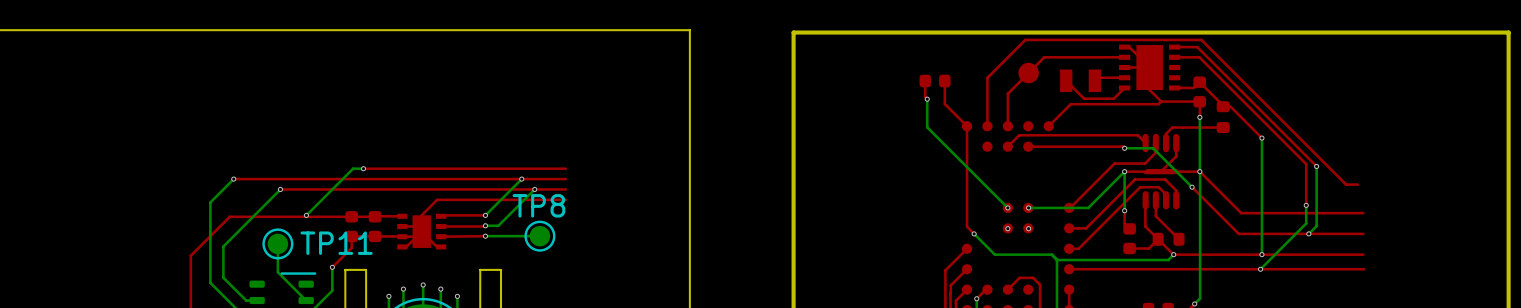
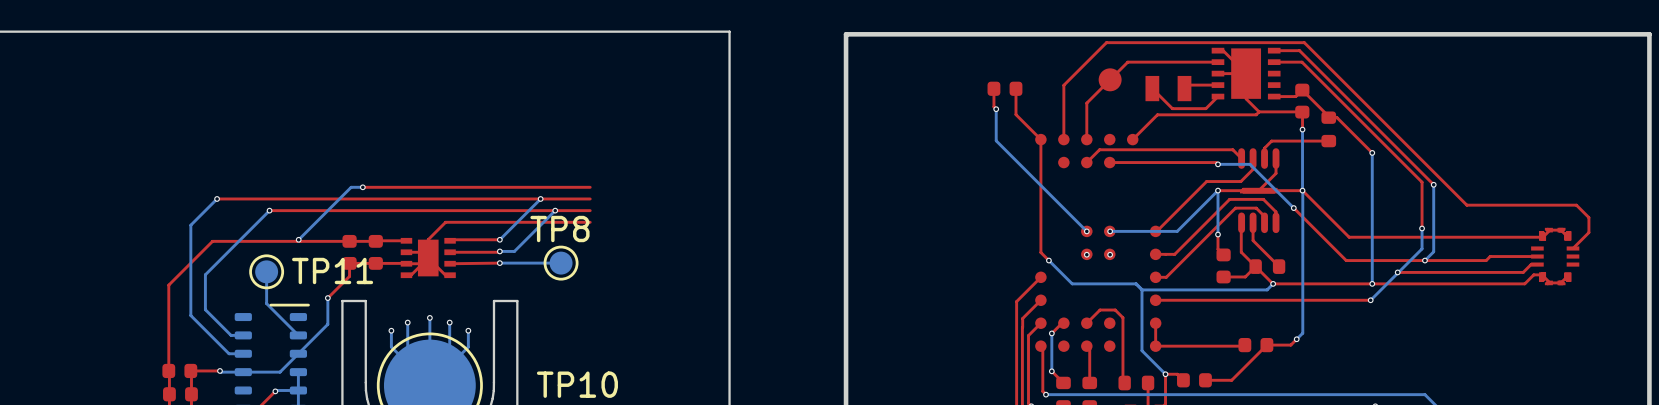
top track: none -> (1480, 205) (1576, 205) (1588, 217) (1588, 232) (1572, 248)
top track: none -> (1567, 237) (1560, 230) (1550, 230) (1543, 238) (1486, 237)
top track: none -> (1537, 256) (1490, 256) (1486, 260)
part: none -> (1555, 256)
top track: none -> (1537, 264) (1531, 264) (1523, 272) (1397, 272)
via: none -> (1397, 272)
top track: none -> (1567, 276) (1560, 282) (1550, 282) (1543, 274) (1533, 274) (1524, 283) (1486, 283)
top track: (1364, 269) (1260, 269) -> none

